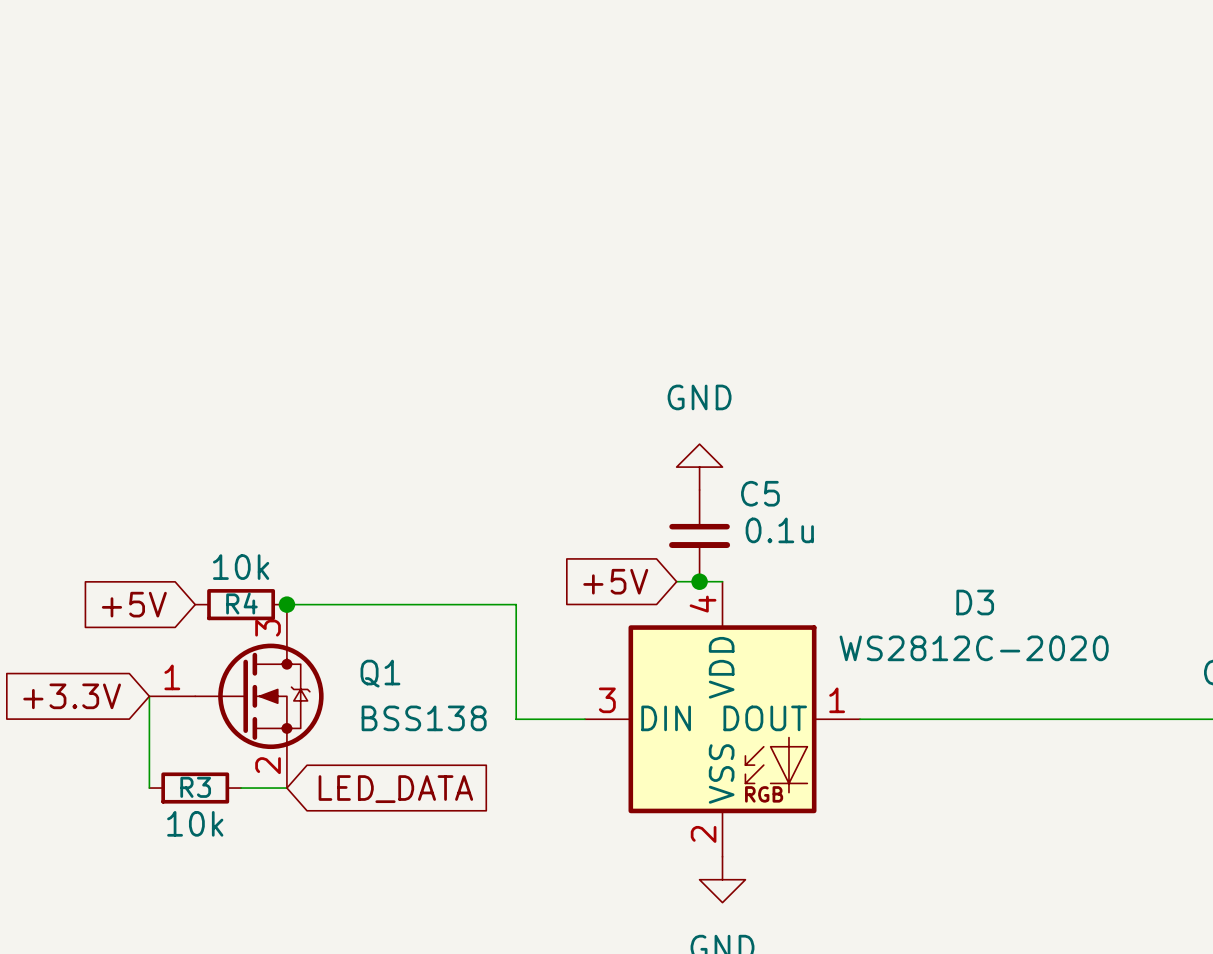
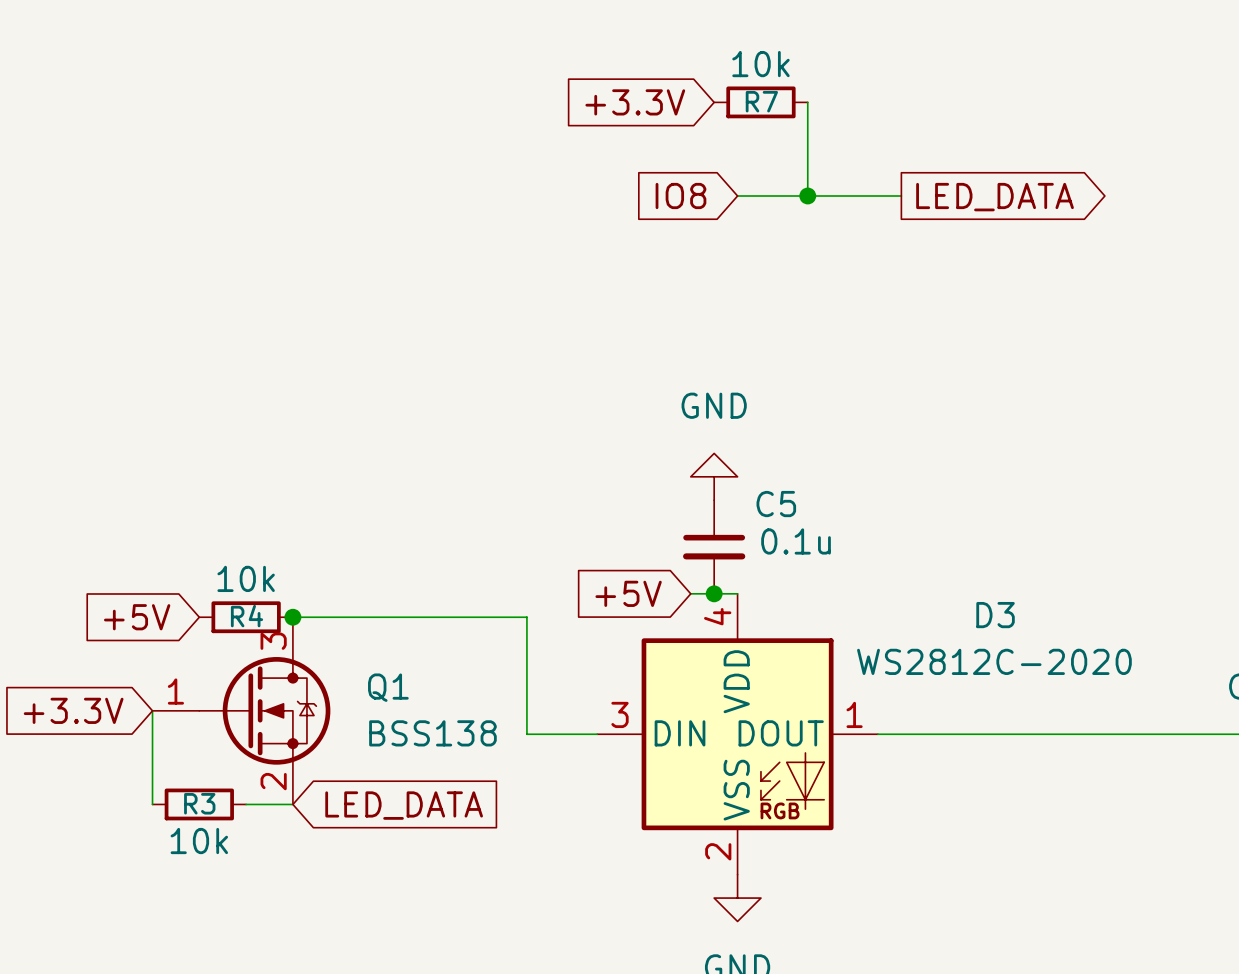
global label: none -> +3.3V (635, 102)
R7: none -> 10k (760, 102)
wire: none -> (807, 102) (807, 196)
global label: none -> IO8 (680, 196)
wire: none -> (737, 196) (901, 196)
junction: none -> (807, 196)
global label: none -> LED_DATA (995, 197)

